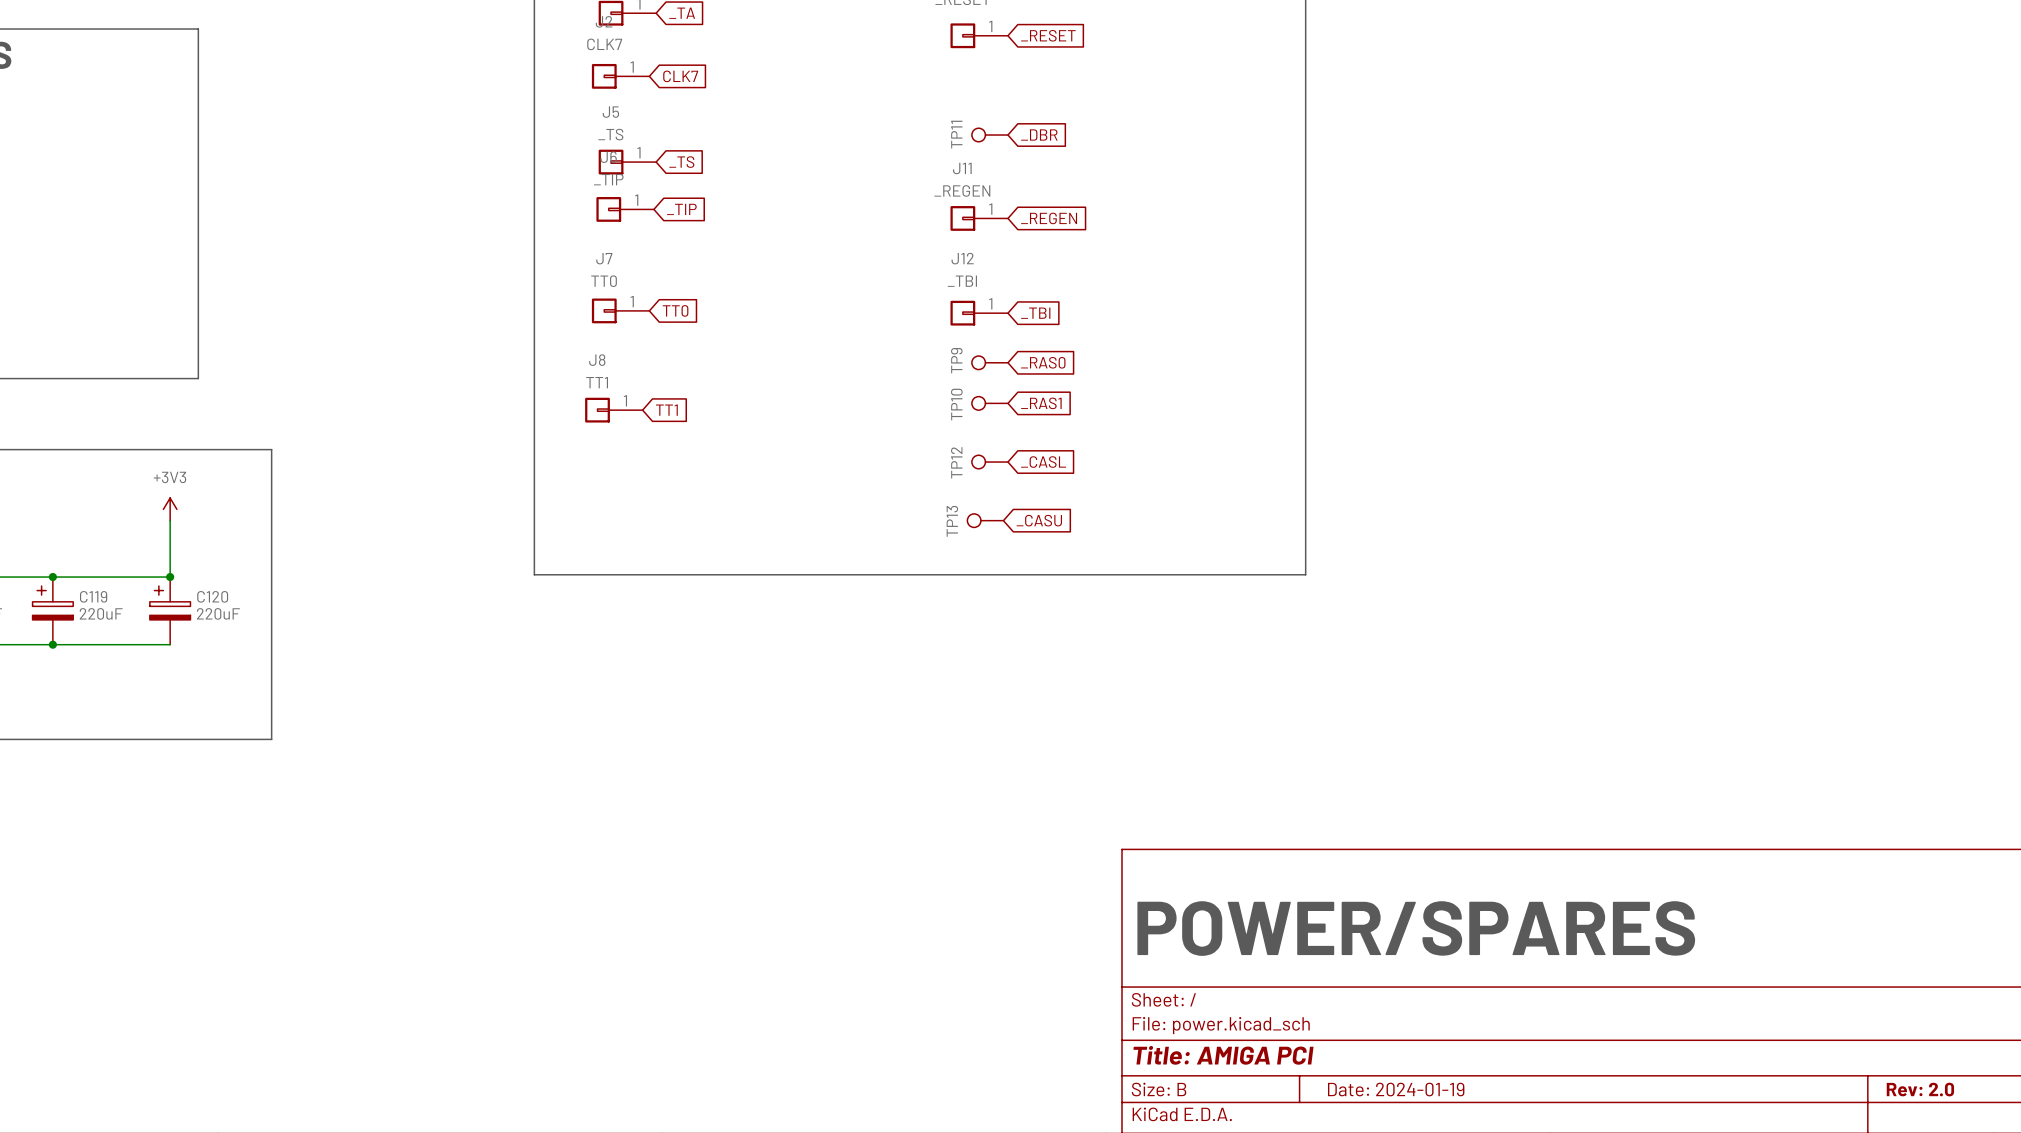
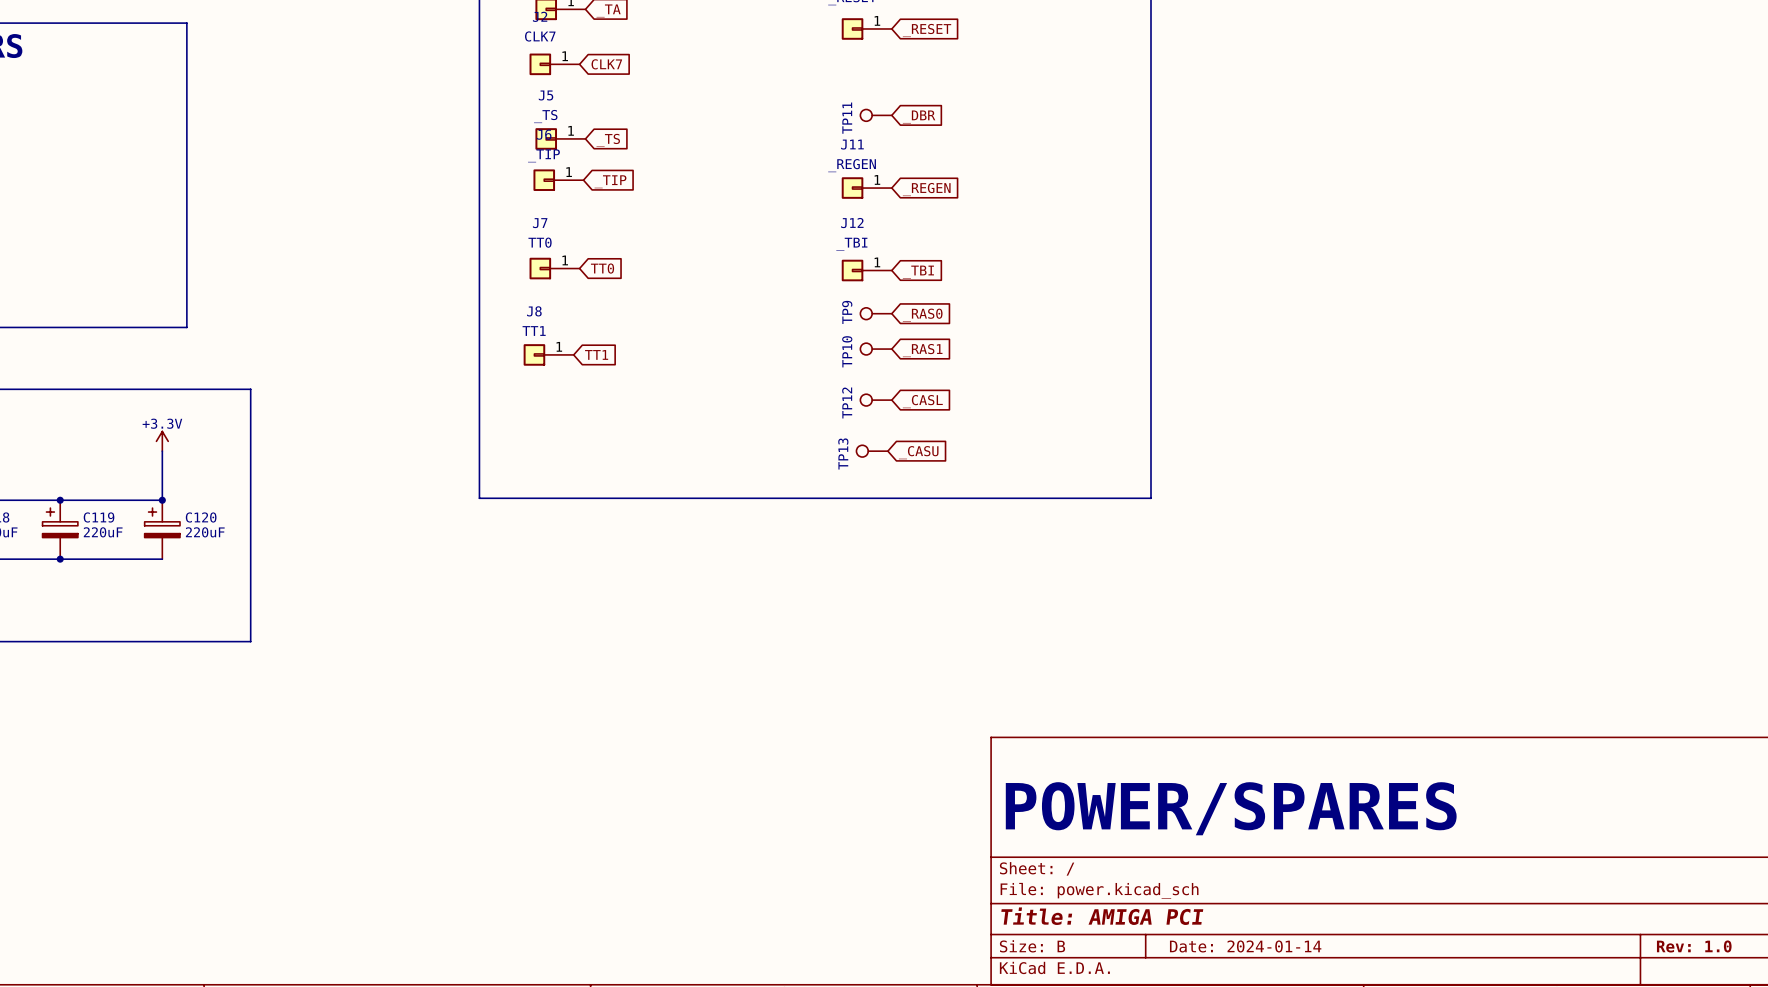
power symbol: +3V3 (170, 509) -> +3.3V (162, 441)
title block: Date: 2024-01-19 (1396, 1089) -> Date: 2024-01-14 (1245, 946)
title block: Rev: 2.0 (1920, 1089) -> Rev: 1.0 (1694, 946)

